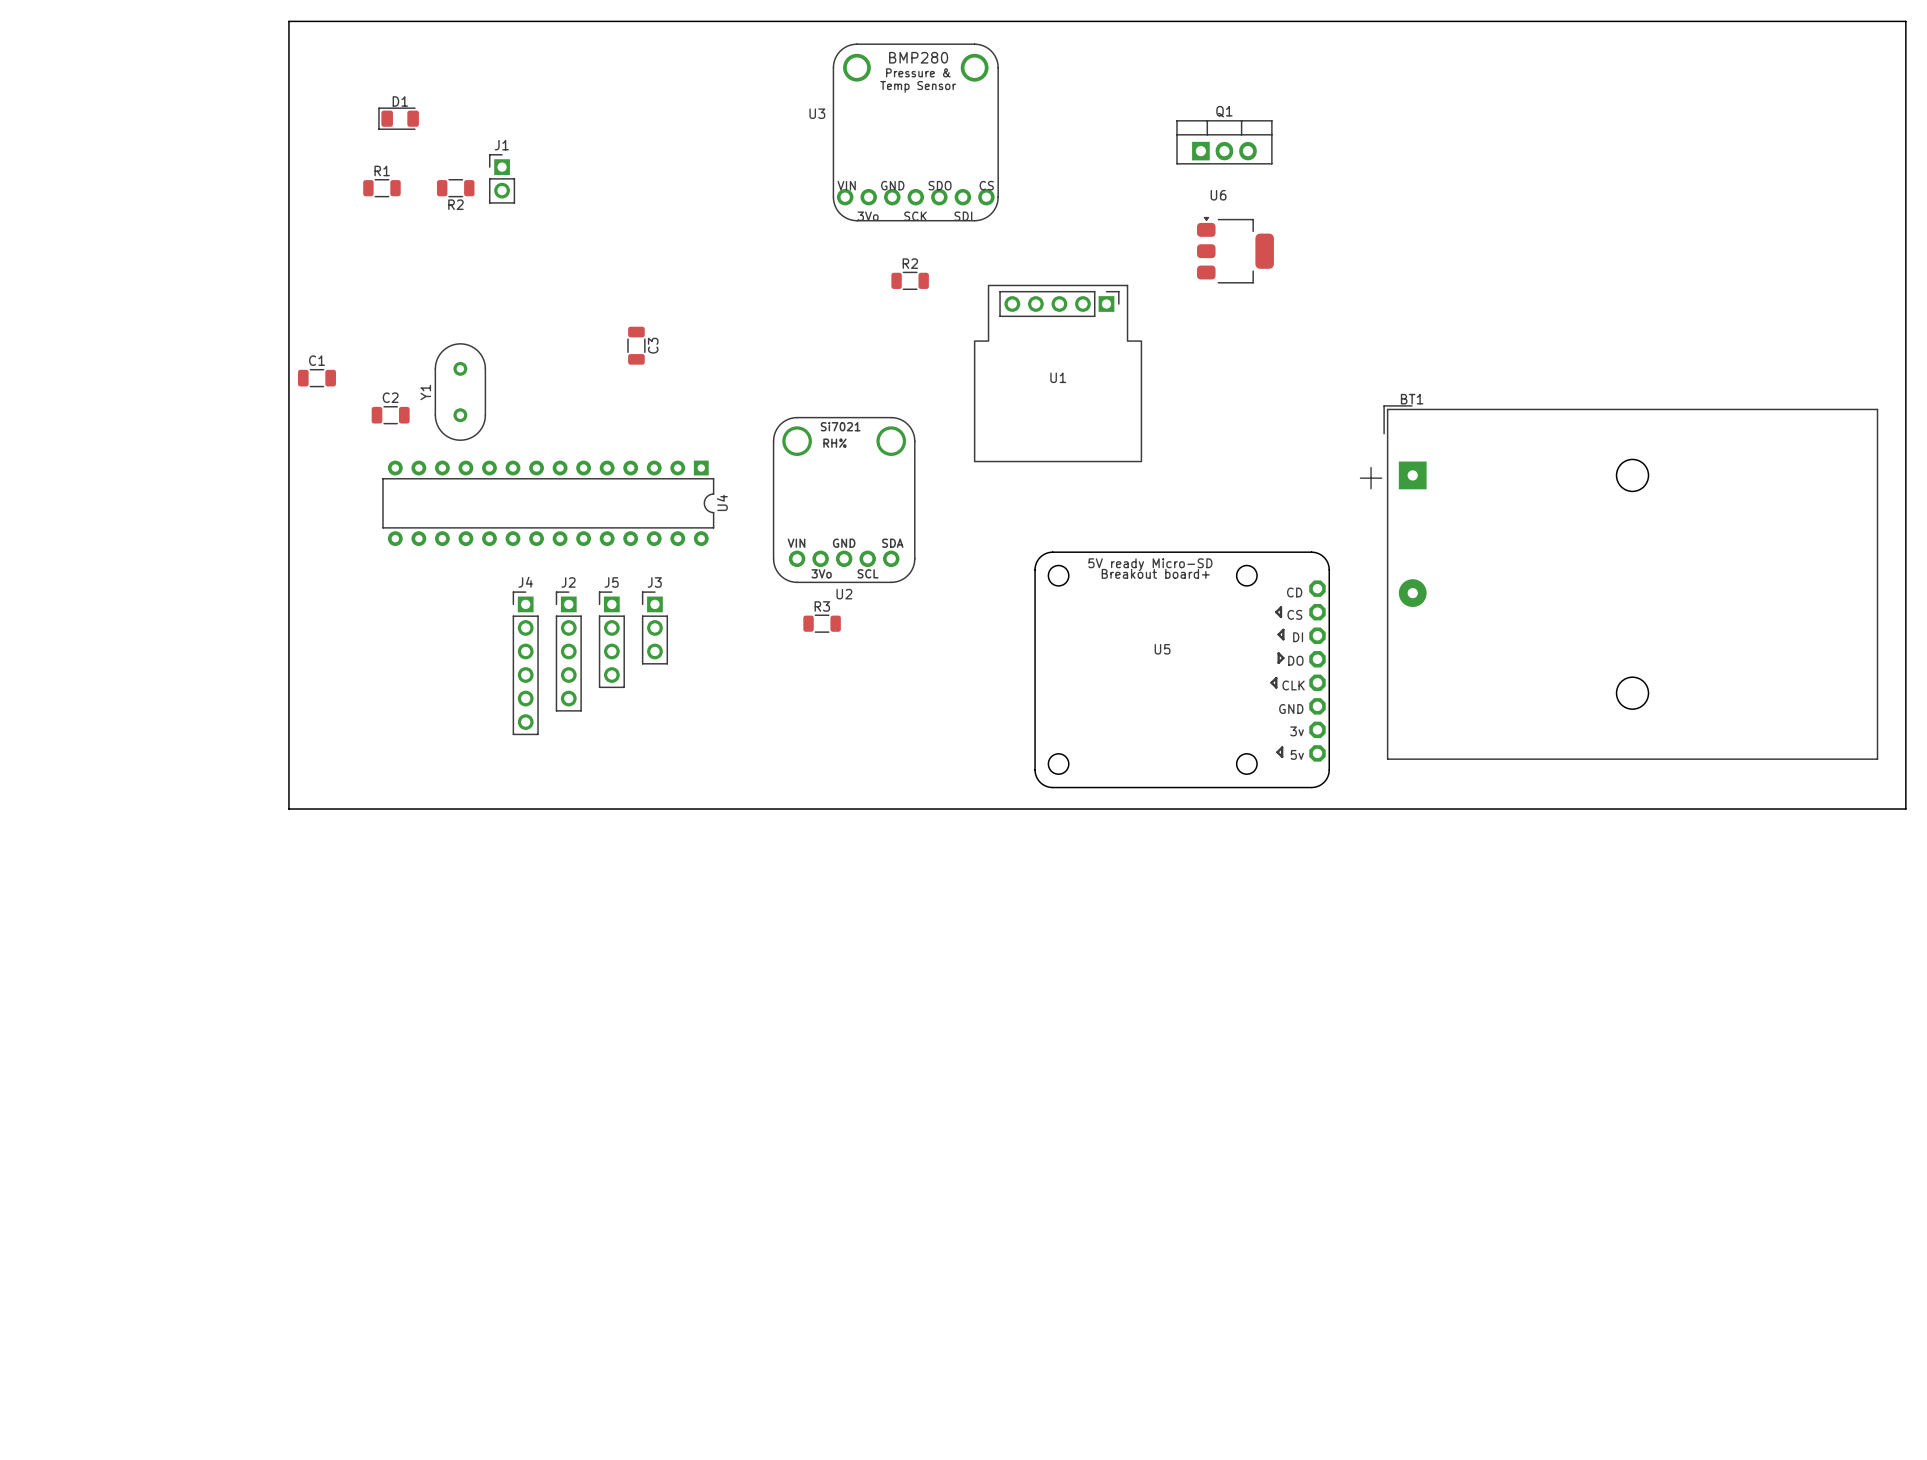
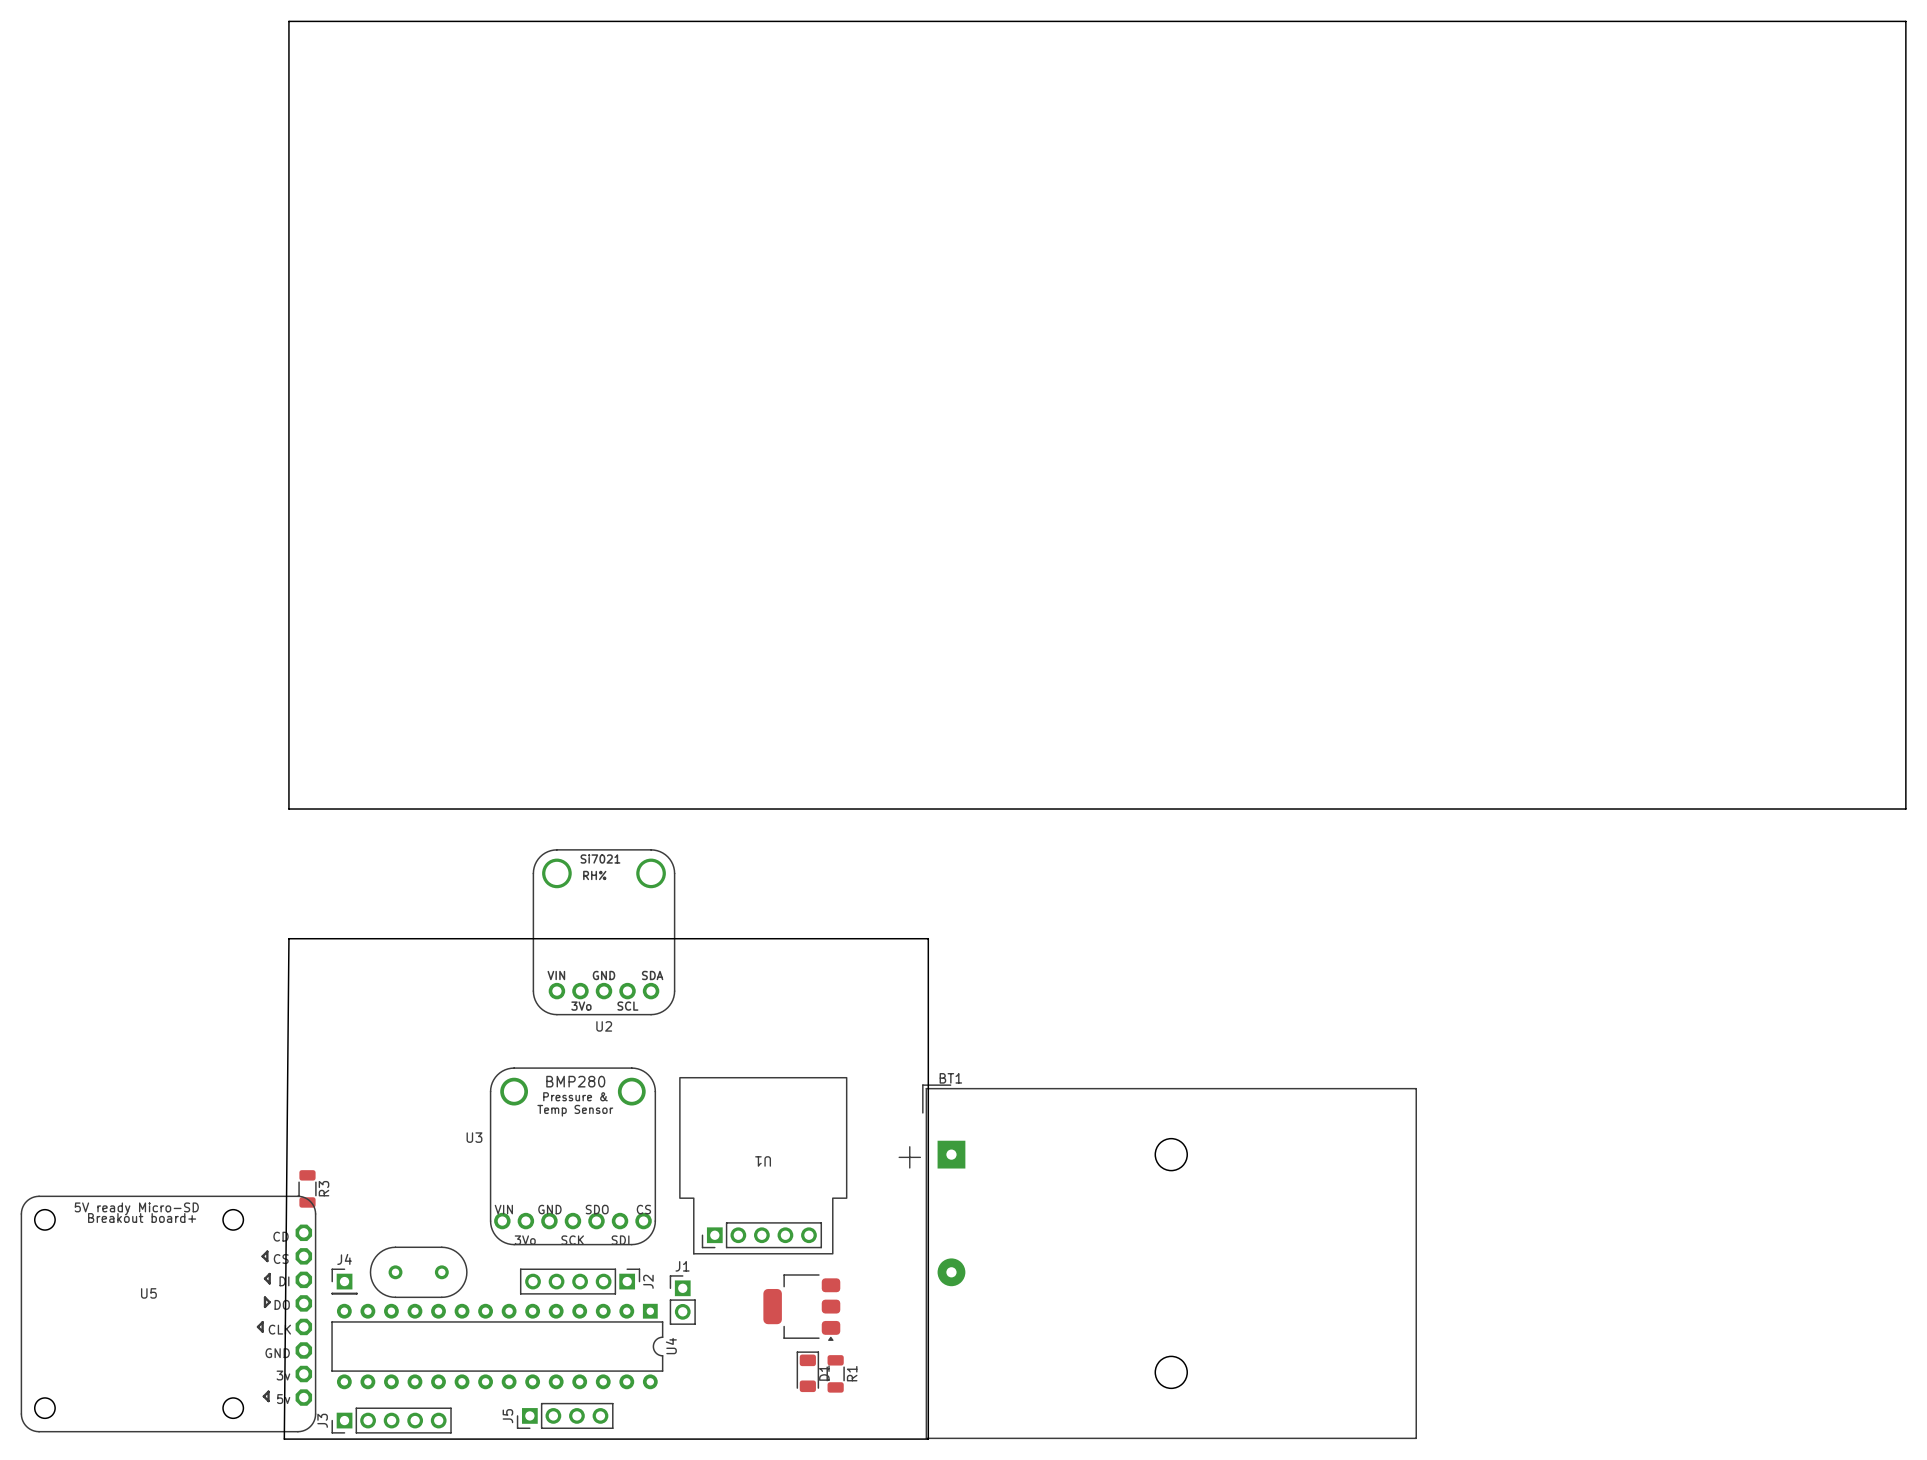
D1 rotation: 0° (398, 118) -> 90° clockwise (807, 1371)
D1 position: (398, 118) -> (807, 1371)
U3 position: (915, 132) -> (572, 1156)
Q1: (1224, 142) -> none
J1 position: (502, 178) -> (682, 1300)
R1 rotation: 0° (381, 188) -> 90° clockwise (835, 1373)
R1 position: (381, 188) -> (835, 1373)
R2: (455, 188) -> none
U6: (1235, 250) -> none
R2: (910, 280) -> none
C3: (636, 345) -> none
U1 rotation: 0° (1058, 373) -> 180° (763, 1165)
U1 position: (1058, 373) -> (763, 1165)
C1: (316, 378) -> none
Y1: (460, 392) -> none
C2: (390, 415) -> none
U2 position: (844, 499) -> (603, 932)
U4 position: (548, 503) -> (497, 1346)
U5 footprint: [1034, 551, 1330, 788] -> [21, 1196, 316, 1432]
J4 name position: J4 (525, 582) -> J4 (344, 1259)
J3 name position: J3 (654, 582) -> J3 (322, 1420)
BT1 position: (1630, 582) -> (1169, 1261)
J4 footprint: [512, 591, 539, 735] -> [331, 1268, 358, 1295]
J3 footprint: [642, 591, 668, 665] -> [331, 1407, 452, 1434]
R3 rotation: 0° (822, 623) -> 90° clockwise (307, 1188)
R3 position: (822, 623) -> (307, 1188)
J5 rotation: 0° (611, 639) -> 90° counterclockwise (565, 1415)
J5 position: (611, 639) -> (565, 1415)
J2 rotation: 0° (568, 651) -> 90° clockwise (580, 1281)
J2 position: (568, 651) -> (580, 1281)
board edge: none -> (288, 938) (284, 1439) (928, 1439) (928, 938) (288, 938)
part: none -> (418, 1272)
part: none -> (801, 1307)

